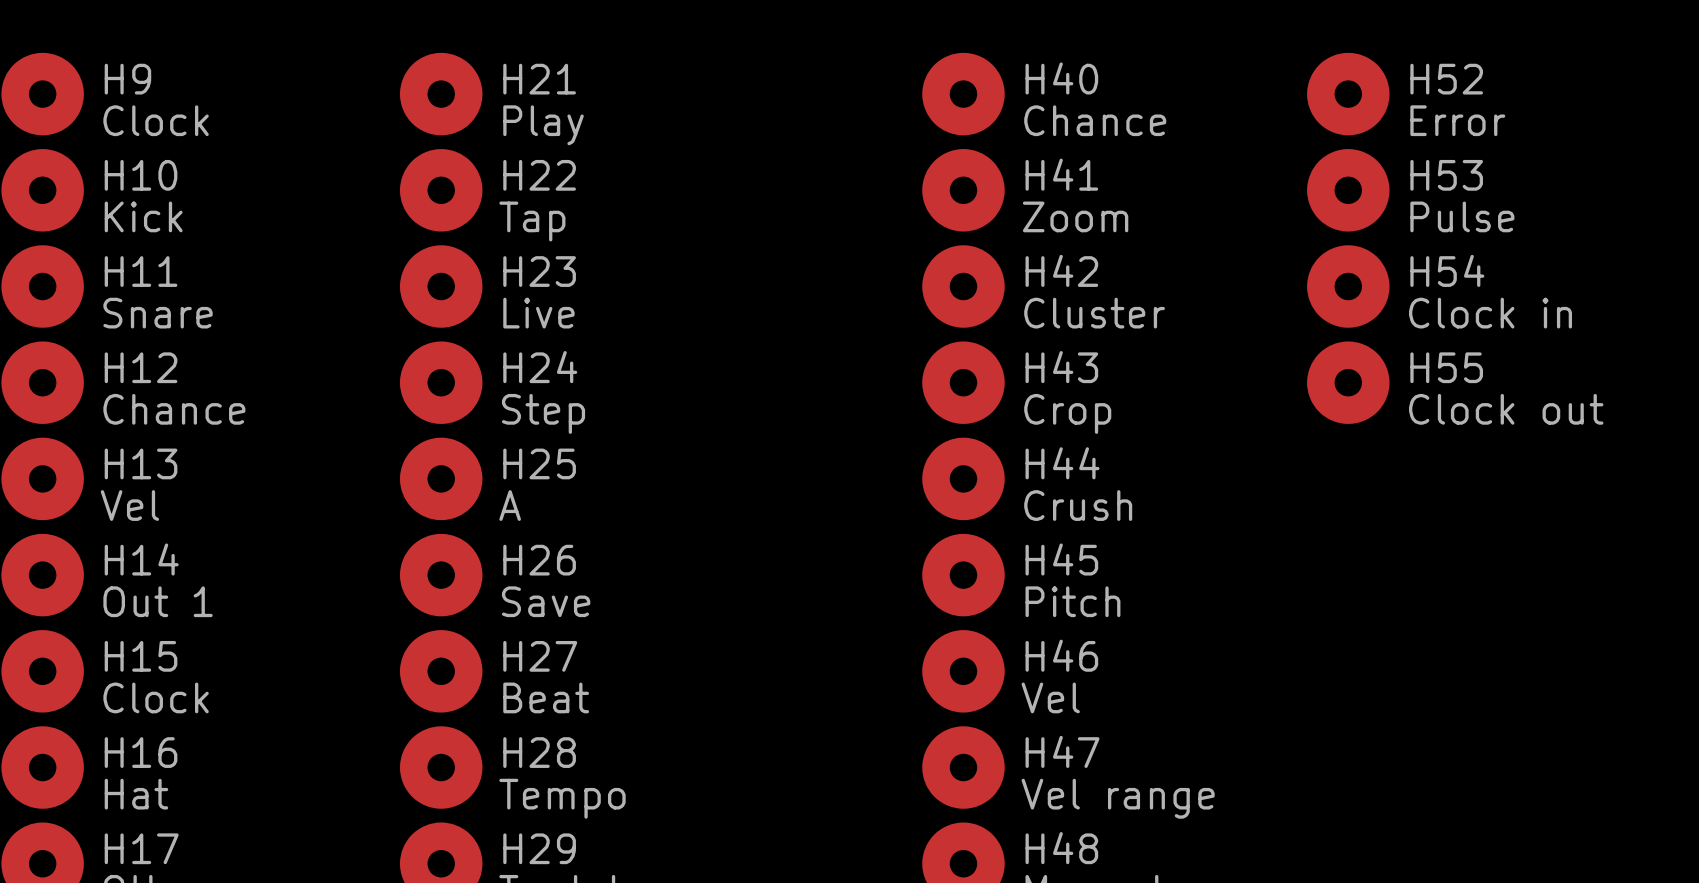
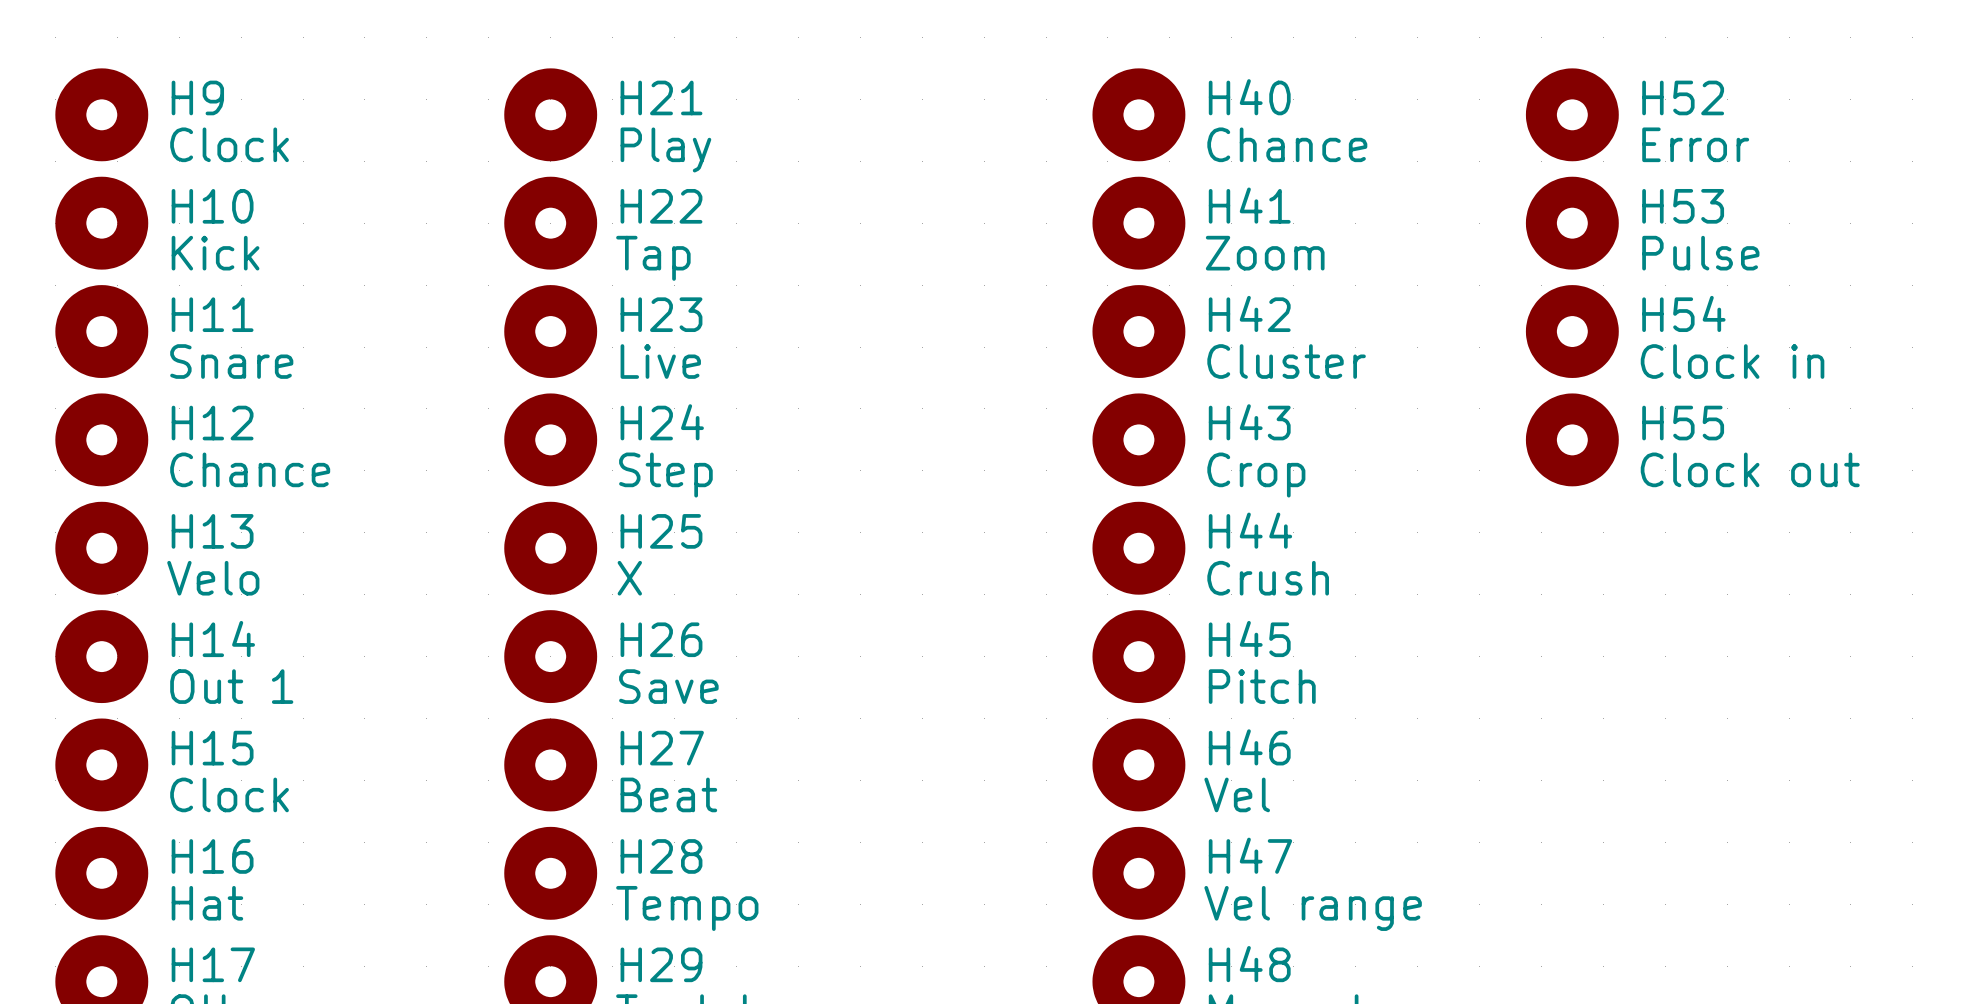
H13 value: Vel (129, 505) -> Velo (213, 578)
H25 value: A (510, 505) -> X (629, 578)

